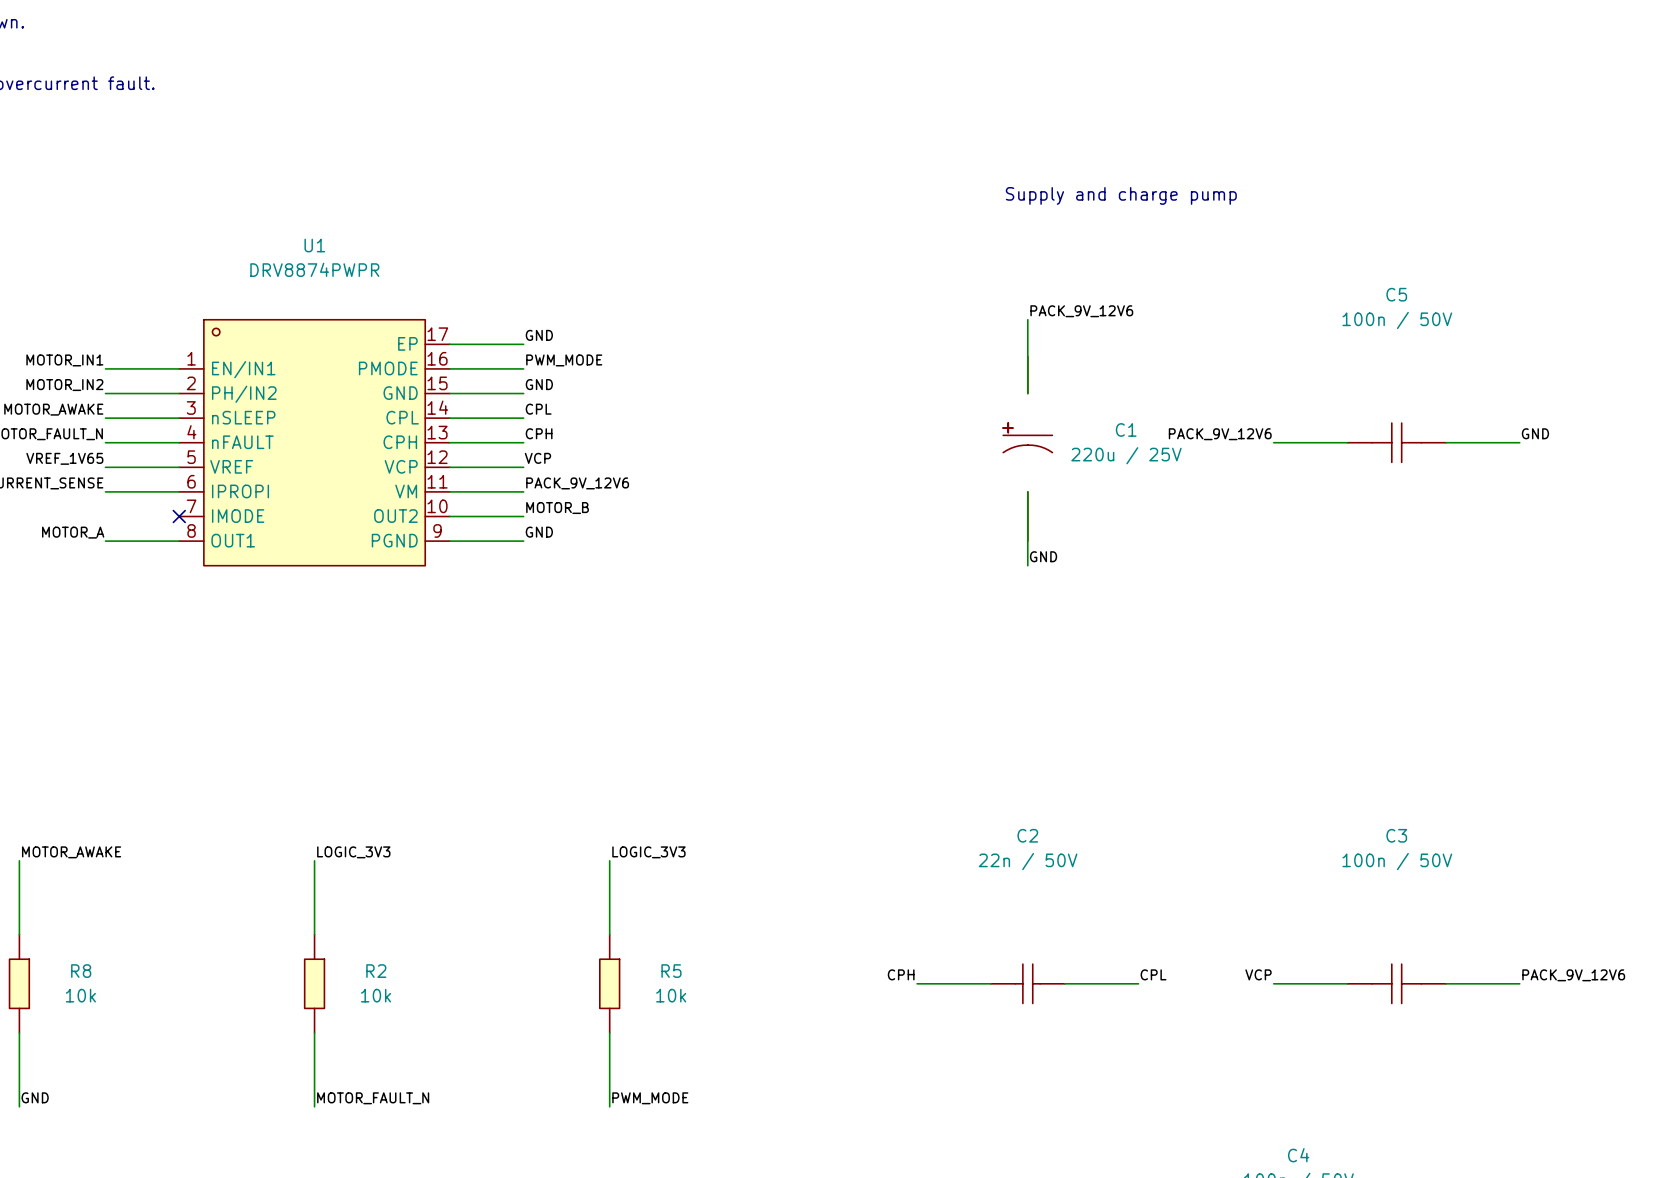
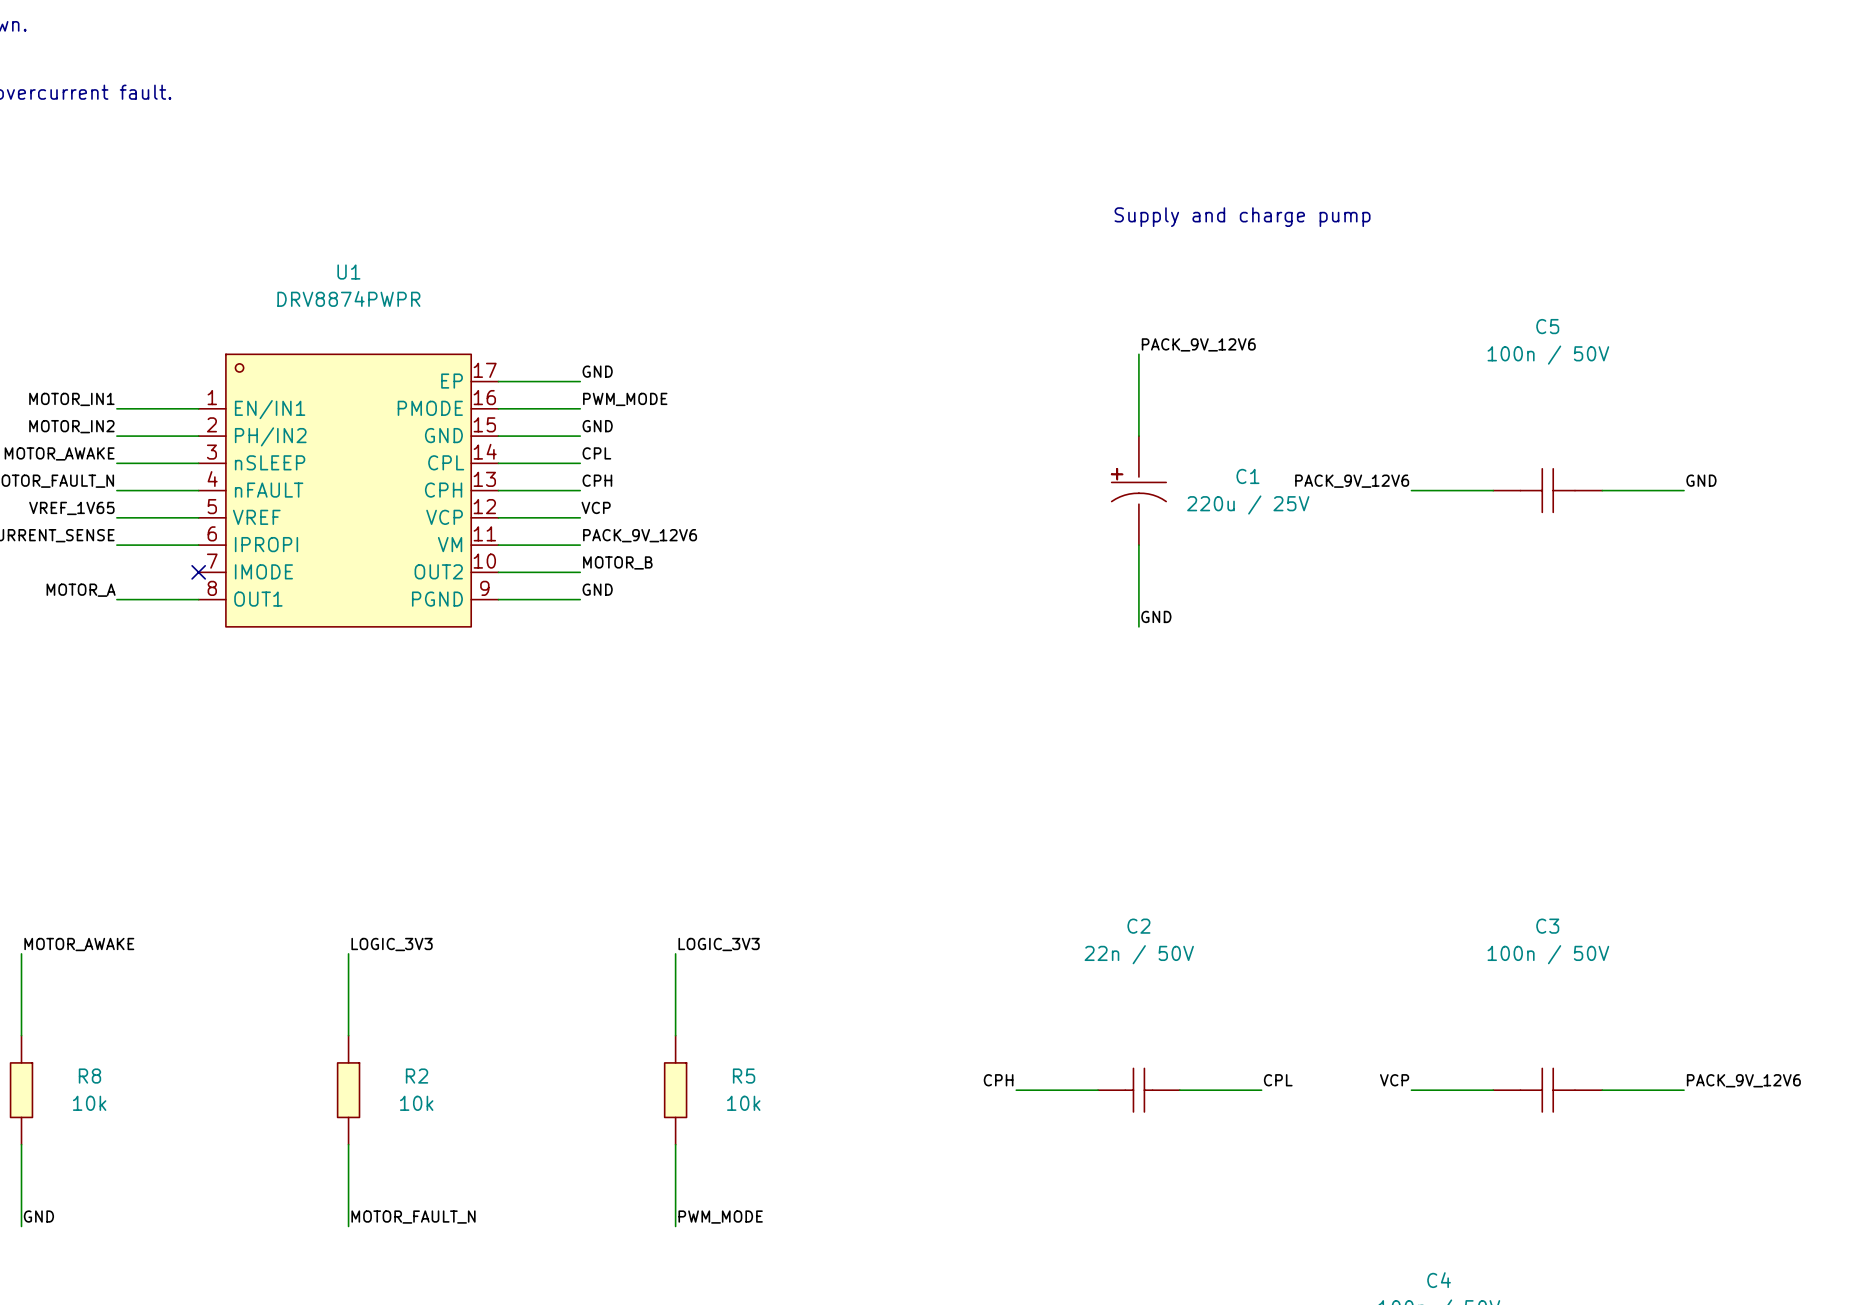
C1 symbol: [1003, 356, 1053, 542] -> [1111, 436, 1167, 546]

